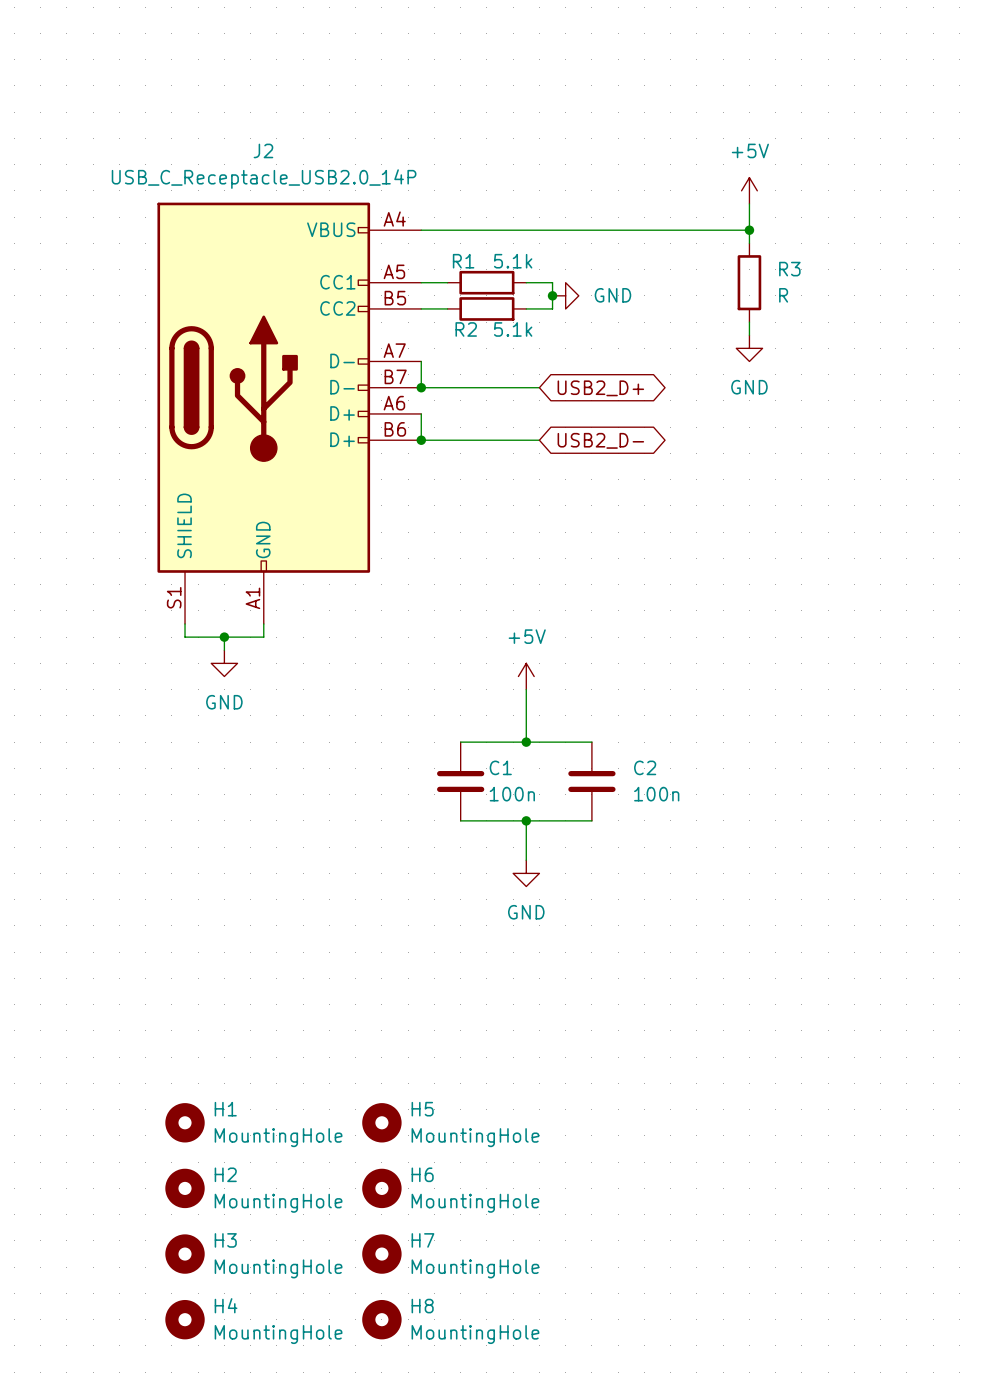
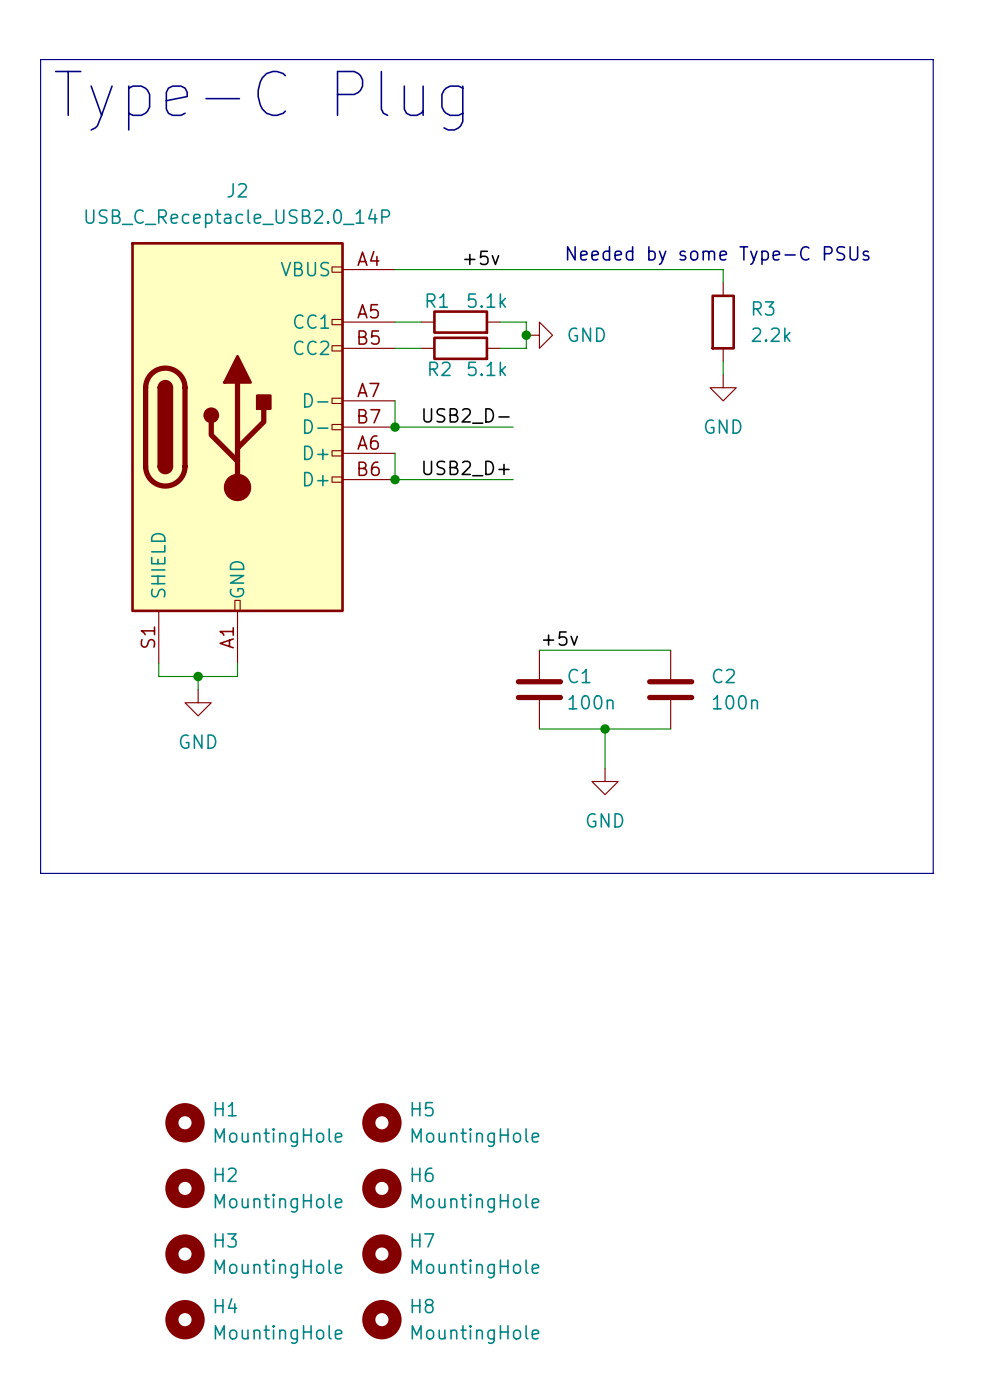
line: none -> (40, 59) (933, 59) (933, 873) (40, 873) (40, 59)
text: none -> Type-C Plug (259, 100)
power symbol: +5V (749, 190) -> none
wire: (749, 203) (749, 243) -> none
wire: (421, 230) (749, 230) -> none
junction: (749, 230) -> none
text: none -> Needed by some Type-C PSUs (718, 255)
label: none -> +5v (481, 257)
wire: none -> (395, 269) (723, 269) (723, 282)
wire: (421, 282) (447, 282) -> (395, 322) (421, 322)
R1 position: (486, 282) -> (460, 322)
wire: (526, 282) (552, 282) (552, 308) (526, 308) -> (500, 322) (526, 322) (526, 348) (500, 348)
R3 position: (749, 282) -> (723, 322)
junction position: (552, 295) -> (526, 335)
power symbol position: GND (565, 295) -> GND (539, 335)
R3 value: R (783, 295) -> 2.2k (771, 334)
wire: (421, 308) (447, 308) -> (395, 348) (421, 348)
R2 position: (486, 308) -> (460, 348)
wire: (749, 322) (749, 335) -> (723, 361) (723, 374)
power symbol position: GND (749, 348) -> GND (723, 387)
wire: (421, 361) (421, 387) (539, 387) -> (395, 400) (395, 427) (513, 427)
junction: (421, 387) -> none
global label: USB2_D+ (600, 388) -> none
J2 position: (289, 413) -> (263, 452)
wire: (421, 413) (421, 440) (539, 440) -> (395, 453) (395, 479) (513, 479)
label: none -> USB2_D- (466, 416)
junction: none -> (395, 427)
junction: (421, 440) -> none
global label: USB2_D- (600, 440) -> none
label: none -> USB2_D+ (466, 468)
junction: none -> (395, 479)
wire: (185, 623) (185, 637) (263, 637) (263, 623) -> (158, 663) (158, 676) (237, 676) (237, 663)
wire: (224, 637) (224, 650) -> (198, 676) (198, 689)
junction position: (224, 637) -> (198, 676)
label: none -> +5v (560, 638)
power symbol position: GND (224, 663) -> GND (198, 702)
power symbol: +5V (526, 676) -> none
wire: (526, 689) (526, 742) -> none
junction: none -> (605, 729)
wire: (460, 742) (591, 742) -> (539, 650) (670, 650)
junction: (526, 742) -> none
C1 position: (460, 781) -> (539, 689)
C2 position: (591, 781) -> (670, 689)
wire: (460, 820) (591, 820) -> (539, 729) (670, 729)
wire: (526, 820) (526, 860) -> (605, 729) (605, 768)
junction: (526, 820) -> none
power symbol position: GND (526, 873) -> GND (605, 781)

